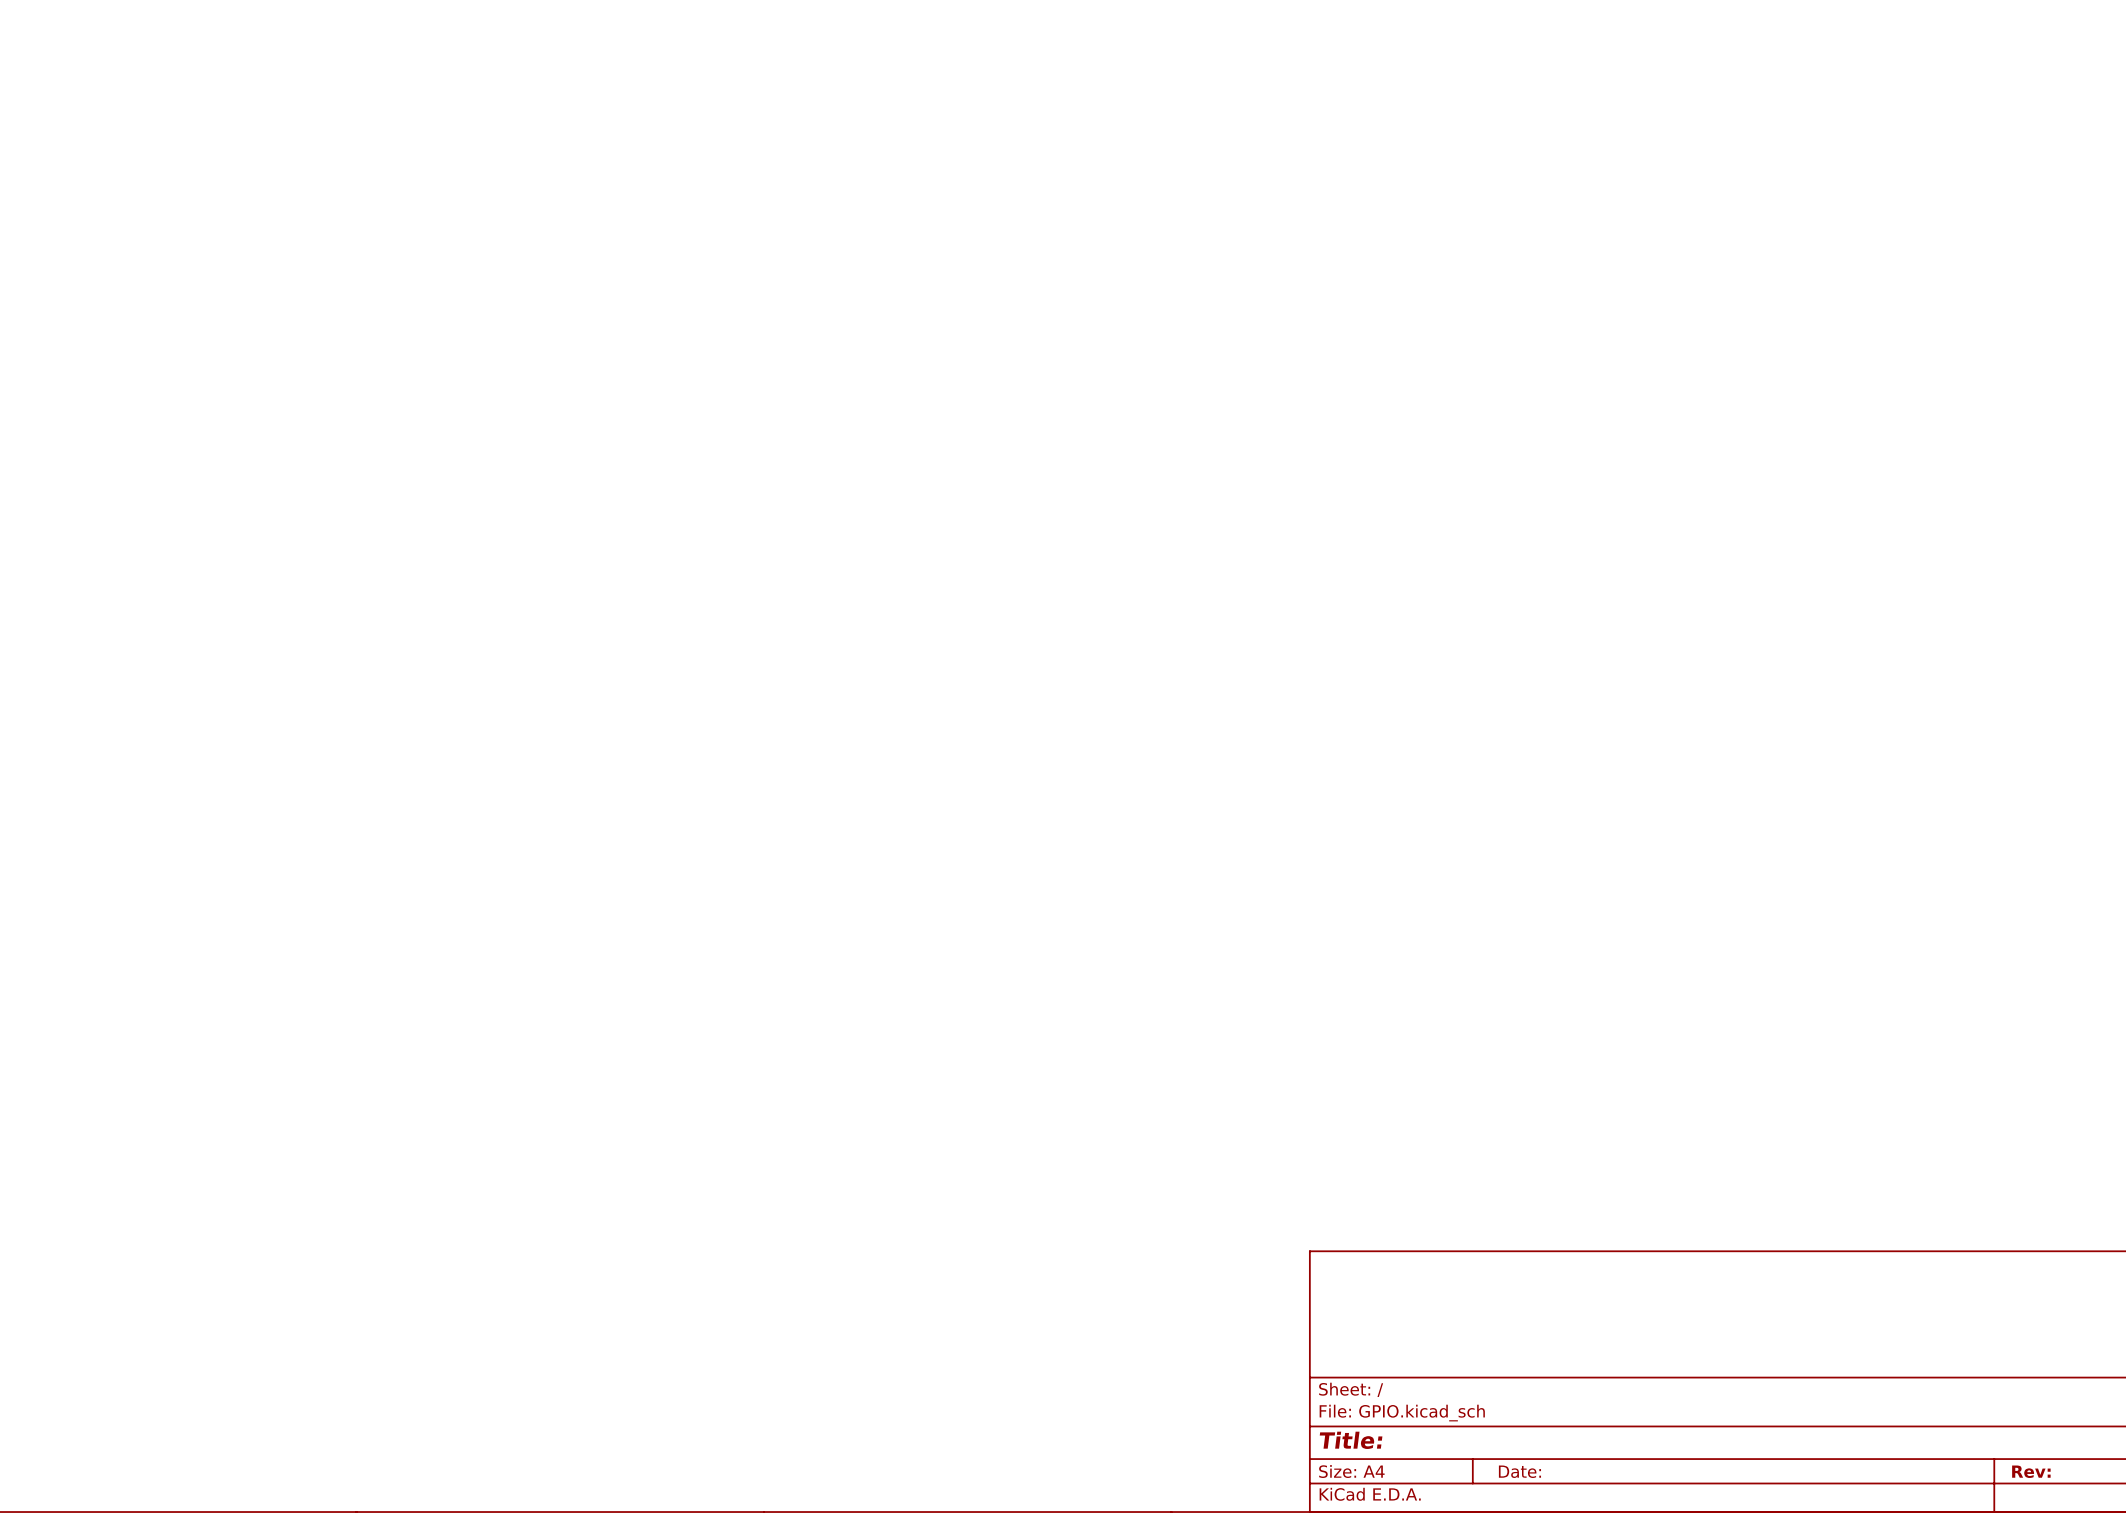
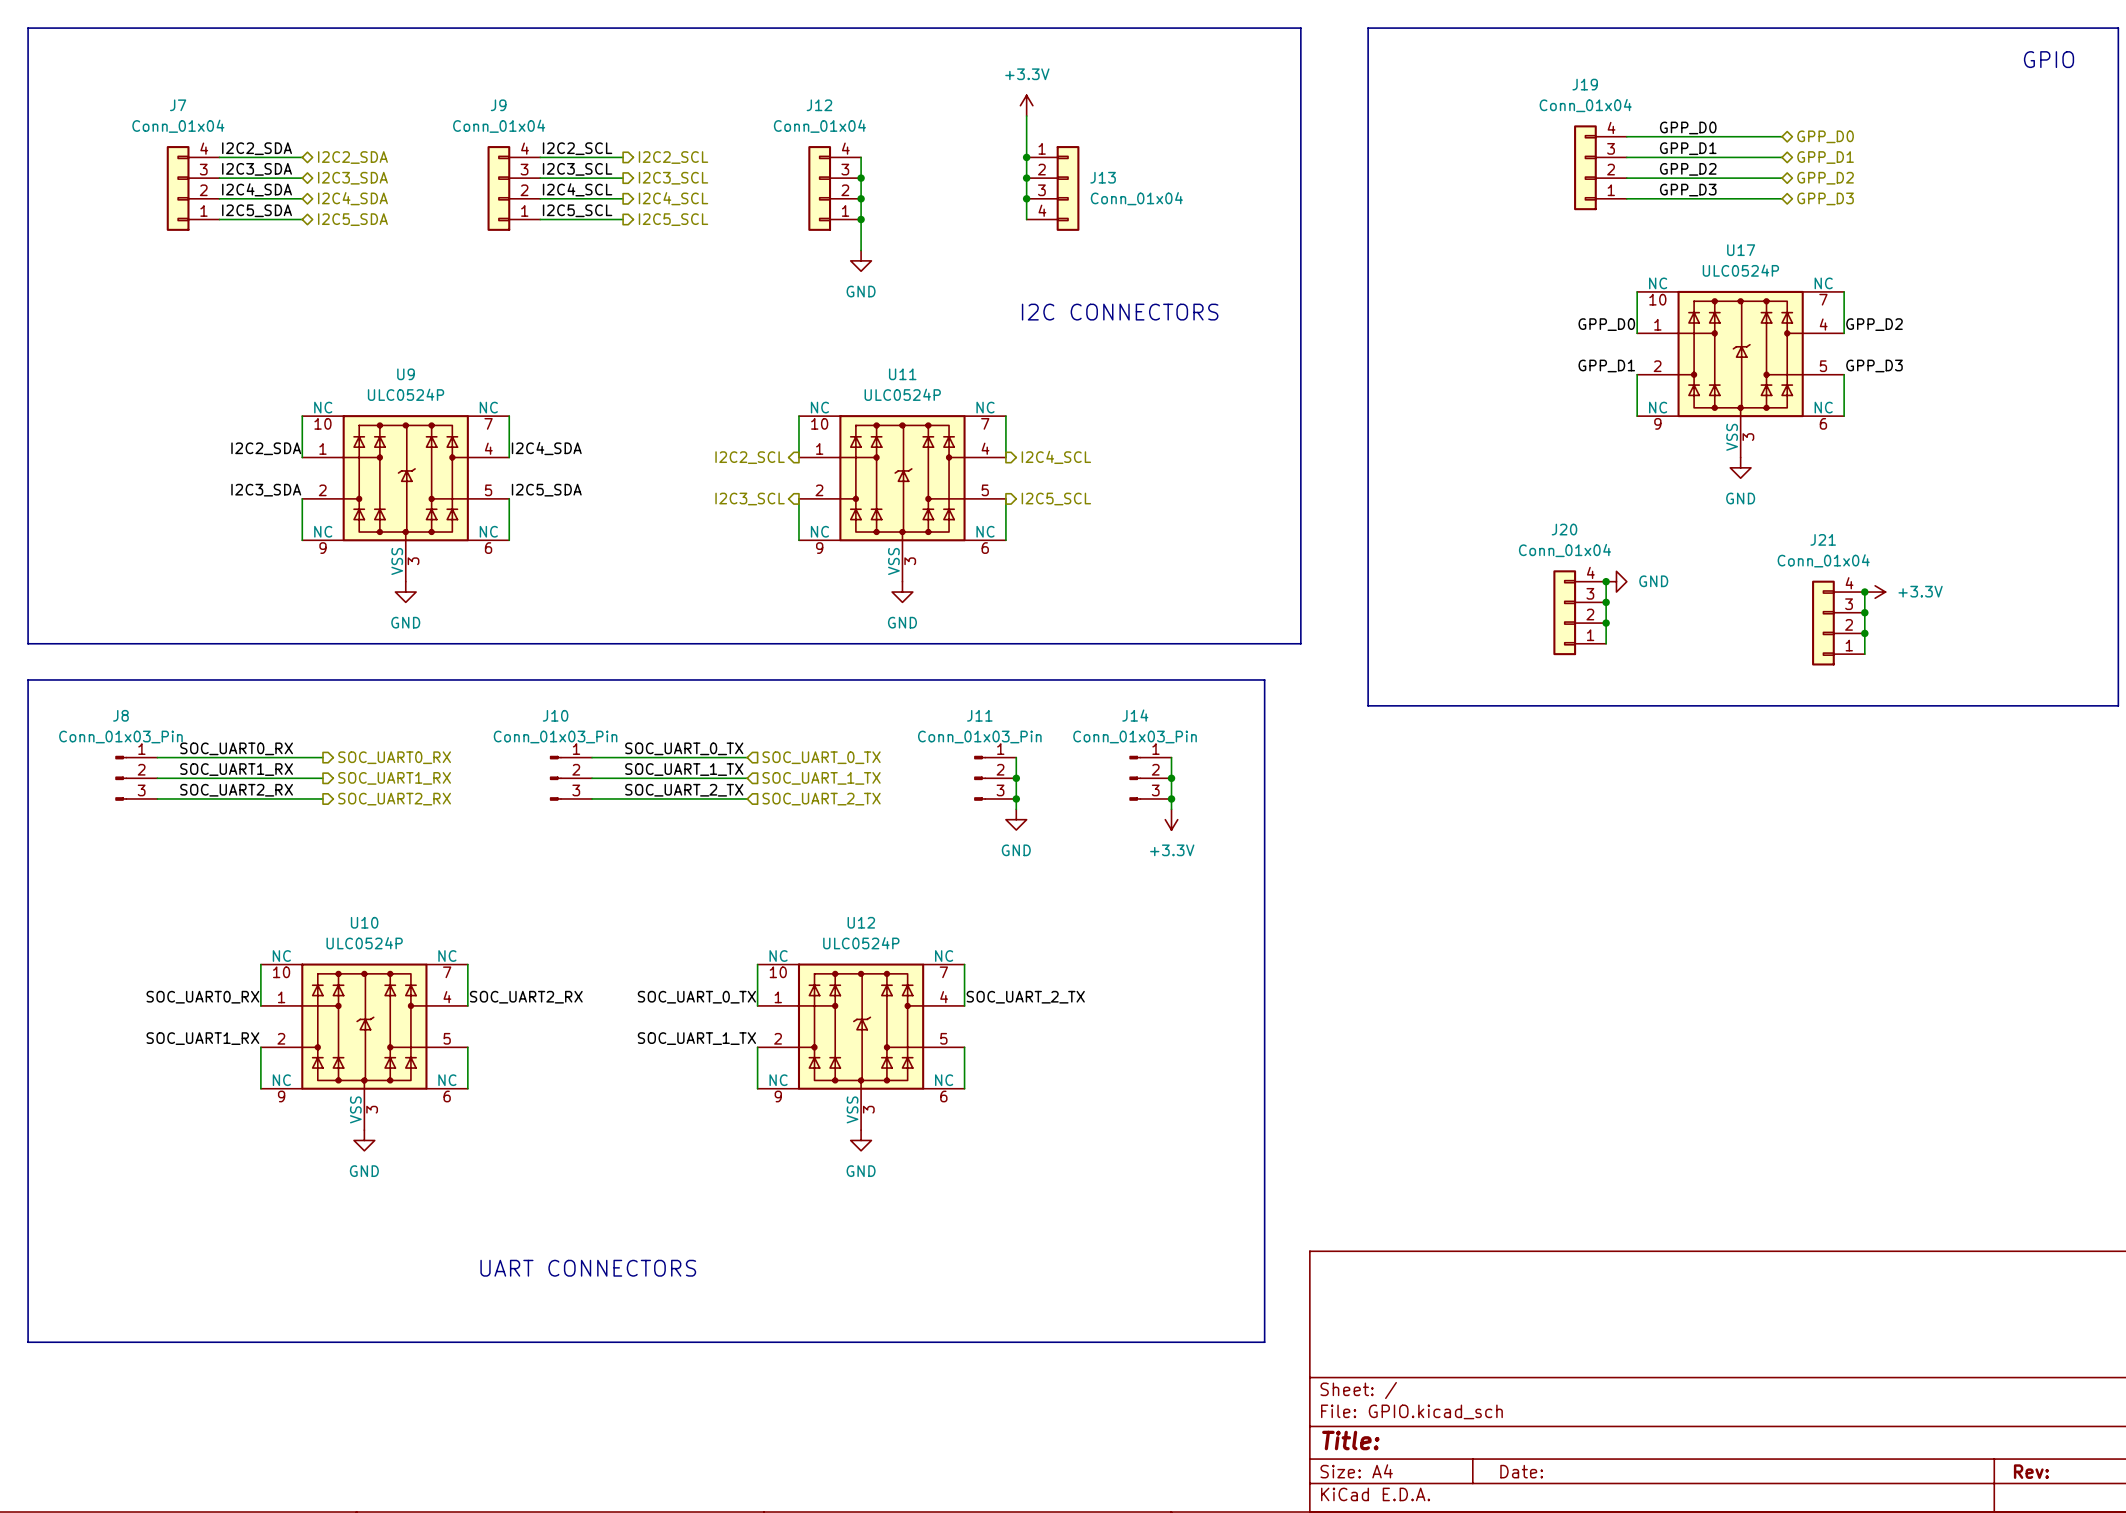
line: none -> (28, 28) (1300, 28) (1300, 643) (28, 643) (28, 28)
line: none -> (1368, 28) (2118, 28) (2118, 705) (1368, 705) (1368, 28)
text: none -> GPIO (2049, 59)
power symbol: none -> +3.3V (1026, 105)
wire: none -> (1026, 116) (1026, 219)
label: none -> GPP_D0 (1688, 127)
wire: none -> (1626, 136) (1782, 136)
hierarchical label: none -> GPP_D0 (1825, 136)
label: none -> I2C2_SDA (257, 148)
label: none -> I2C2_SCL (577, 148)
label: none -> GPP_D1 (1688, 148)
wire: none -> (219, 157) (302, 157)
wire: none -> (540, 157) (623, 157)
wire: none -> (861, 157) (861, 250)
junction: none -> (1026, 157)
wire: none -> (1626, 157) (1782, 157)
hierarchical label: none -> I2C2_SDA (352, 157)
hierarchical label: none -> I2C2_SCL (673, 157)
hierarchical label: none -> GPP_D1 (1825, 157)
J19: none -> Conn_01x04 (1600, 167)
label: none -> I2C3_SDA (257, 169)
label: none -> I2C3_SCL (577, 169)
label: none -> GPP_D2 (1688, 169)
wire: none -> (219, 178) (302, 178)
wire: none -> (540, 178) (623, 178)
junction: none -> (861, 178)
junction: none -> (1026, 178)
wire: none -> (1626, 178) (1782, 178)
hierarchical label: none -> I2C3_SDA (352, 178)
hierarchical label: none -> I2C3_SCL (673, 178)
hierarchical label: none -> GPP_D2 (1825, 178)
J7: none -> Conn_01x04 (193, 188)
J9: none -> Conn_01x04 (513, 188)
J12: none -> Conn_01x04 (834, 188)
J13: none -> Conn_01x04 (1053, 188)
label: none -> I2C4_SDA (257, 189)
label: none -> I2C4_SCL (577, 189)
label: none -> GPP_D3 (1688, 190)
wire: none -> (219, 198) (302, 198)
wire: none -> (540, 198) (623, 198)
junction: none -> (861, 198)
junction: none -> (1026, 198)
wire: none -> (1626, 198) (1782, 198)
hierarchical label: none -> I2C4_SDA (352, 198)
hierarchical label: none -> I2C4_SCL (673, 198)
hierarchical label: none -> GPP_D3 (1825, 198)
label: none -> I2C5_SDA (257, 210)
label: none -> I2C5_SCL (577, 210)
wire: none -> (219, 219) (302, 219)
wire: none -> (540, 219) (623, 219)
junction: none -> (861, 219)
hierarchical label: none -> I2C5_SDA (352, 219)
hierarchical label: none -> I2C5_SCL (673, 219)
power symbol: none -> GND (861, 260)
wire: none -> (1637, 291) (1637, 333)
wire: none -> (1844, 291) (1844, 333)
text: none -> I2C CONNECTORS (1120, 312)
label: none -> GPP_D0 (1606, 324)
label: none -> GPP_D2 (1874, 324)
label: none -> GPP_D1 (1606, 365)
label: none -> GPP_D3 (1874, 365)
wire: none -> (1637, 374) (1637, 416)
U17: none -> ULC0524P (1740, 374)
wire: none -> (1844, 374) (1844, 416)
wire: none -> (302, 416) (302, 457)
wire: none -> (509, 416) (509, 457)
wire: none -> (798, 416) (798, 457)
wire: none -> (1005, 416) (1005, 457)
label: none -> I2C2_SDA (266, 448)
label: none -> I2C4_SDA (546, 448)
hierarchical label: none -> I2C2_SCL (750, 457)
hierarchical label: none -> I2C4_SCL (1056, 457)
power symbol: none -> GND (1740, 467)
label: none -> I2C3_SDA (266, 490)
label: none -> I2C5_SDA (546, 490)
wire: none -> (302, 498) (302, 540)
U9: none -> ULC0524P (405, 498)
wire: none -> (509, 498) (509, 540)
wire: none -> (798, 498) (798, 540)
U11: none -> ULC0524P (902, 498)
wire: none -> (1005, 498) (1005, 540)
hierarchical label: none -> I2C3_SCL (750, 499)
hierarchical label: none -> I2C5_SCL (1056, 499)
wire: none -> (1606, 581) (1606, 643)
junction: none -> (1606, 581)
power symbol: none -> GND (1616, 581)
power symbol: none -> GND (405, 592)
power symbol: none -> GND (902, 592)
wire: none -> (1864, 592) (1864, 654)
junction: none -> (1864, 592)
power symbol: none -> +3.3V (1875, 592)
junction: none -> (1606, 602)
J20: none -> Conn_01x04 (1579, 612)
junction: none -> (1864, 612)
junction: none -> (1606, 623)
J21: none -> Conn_01x04 (1838, 623)
junction: none -> (1864, 633)
line: none -> (28, 679) (1264, 679) (1264, 1342) (28, 1342) (28, 679)
label: none -> SOC_UART0_RX (236, 748)
label: none -> SOC_UART_0_TX (684, 748)
wire: none -> (157, 757) (322, 757)
wire: none -> (592, 757) (747, 757)
wire: none -> (1016, 757) (1016, 809)
wire: none -> (1171, 757) (1171, 809)
hierarchical label: none -> SOC_UART0_RX (394, 757)
hierarchical label: none -> SOC_UART_0_TX (821, 757)
label: none -> SOC_UART1_RX (236, 769)
label: none -> SOC_UART_1_TX (684, 769)
J8: none -> Conn_01x03_Pin (136, 778)
wire: none -> (157, 778) (322, 778)
J10: none -> Conn_01x03_Pin (571, 778)
wire: none -> (592, 778) (747, 778)
J11: none -> Conn_01x03_Pin (995, 778)
junction: none -> (1016, 778)
J14: none -> Conn_01x03_Pin (1150, 778)
junction: none -> (1171, 778)
hierarchical label: none -> SOC_UART1_RX (394, 778)
hierarchical label: none -> SOC_UART_1_TX (821, 778)
label: none -> SOC_UART2_RX (236, 790)
label: none -> SOC_UART_2_TX (684, 790)
wire: none -> (157, 798) (322, 798)
wire: none -> (592, 798) (747, 798)
junction: none -> (1016, 798)
junction: none -> (1171, 798)
hierarchical label: none -> SOC_UART2_RX (394, 799)
hierarchical label: none -> SOC_UART_2_TX (821, 799)
power symbol: none -> GND (1016, 819)
power symbol: none -> +3.3V (1171, 819)
wire: none -> (260, 964) (260, 1005)
wire: none -> (467, 964) (467, 1005)
wire: none -> (757, 964) (757, 1005)
wire: none -> (964, 964) (964, 1005)
label: none -> SOC_UART0_RX (202, 997)
label: none -> SOC_UART2_RX (526, 997)
label: none -> SOC_UART_0_TX (696, 997)
label: none -> SOC_UART_2_TX (1025, 997)
label: none -> SOC_UART1_RX (202, 1038)
label: none -> SOC_UART_1_TX (696, 1038)
U10: none -> ULC0524P (364, 1046)
U12: none -> ULC0524P (861, 1046)
wire: none -> (260, 1047) (260, 1088)
wire: none -> (467, 1047) (467, 1088)
wire: none -> (757, 1047) (757, 1088)
wire: none -> (964, 1047) (964, 1088)
power symbol: none -> GND (364, 1140)
power symbol: none -> GND (861, 1140)
text: none -> UART CONNECTORS (588, 1268)

